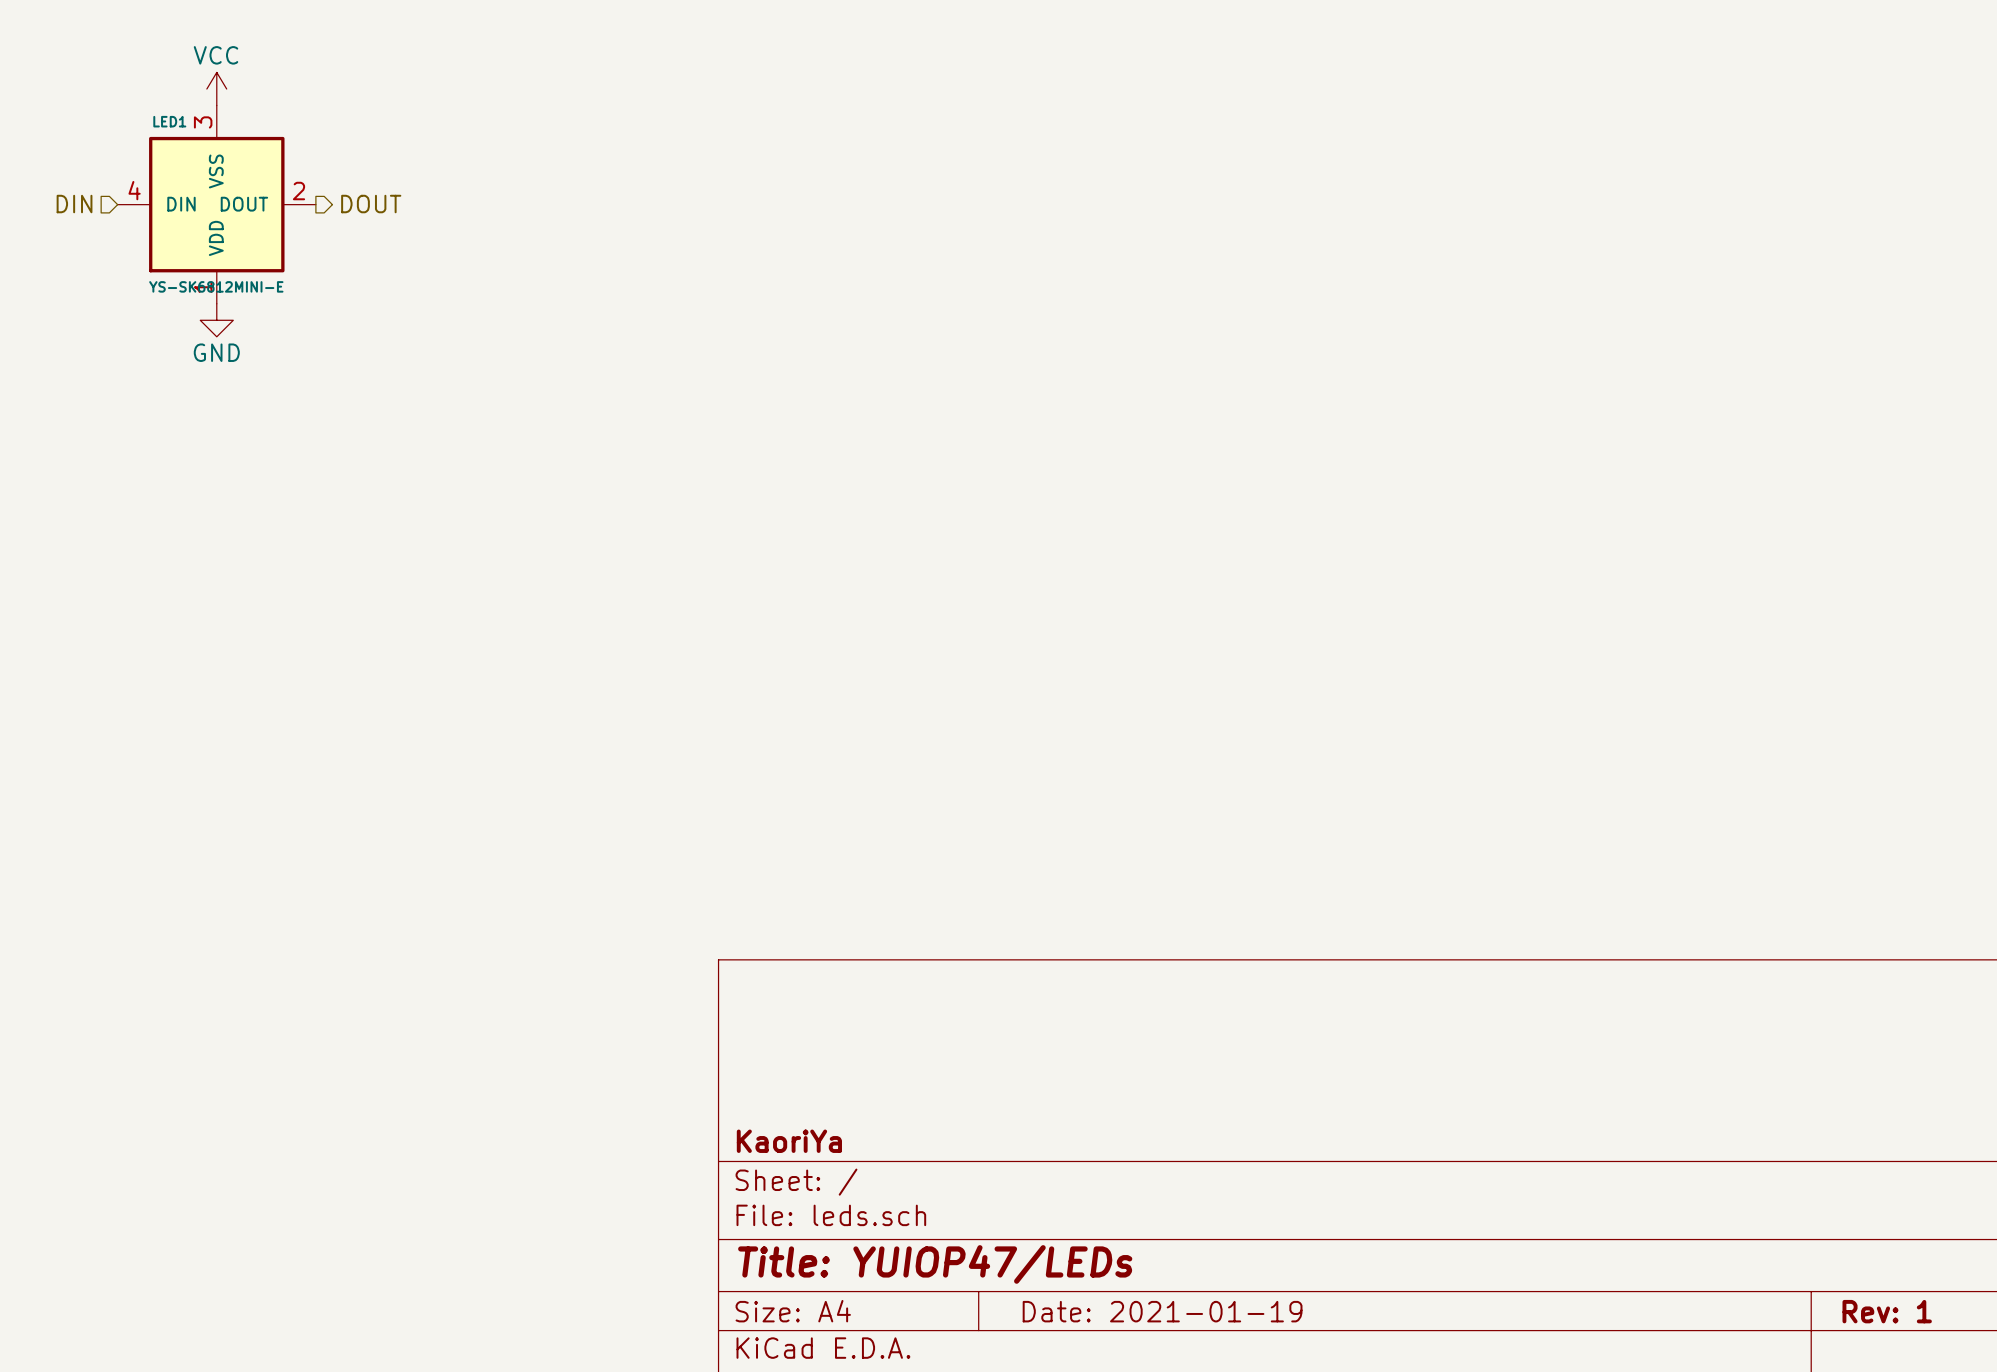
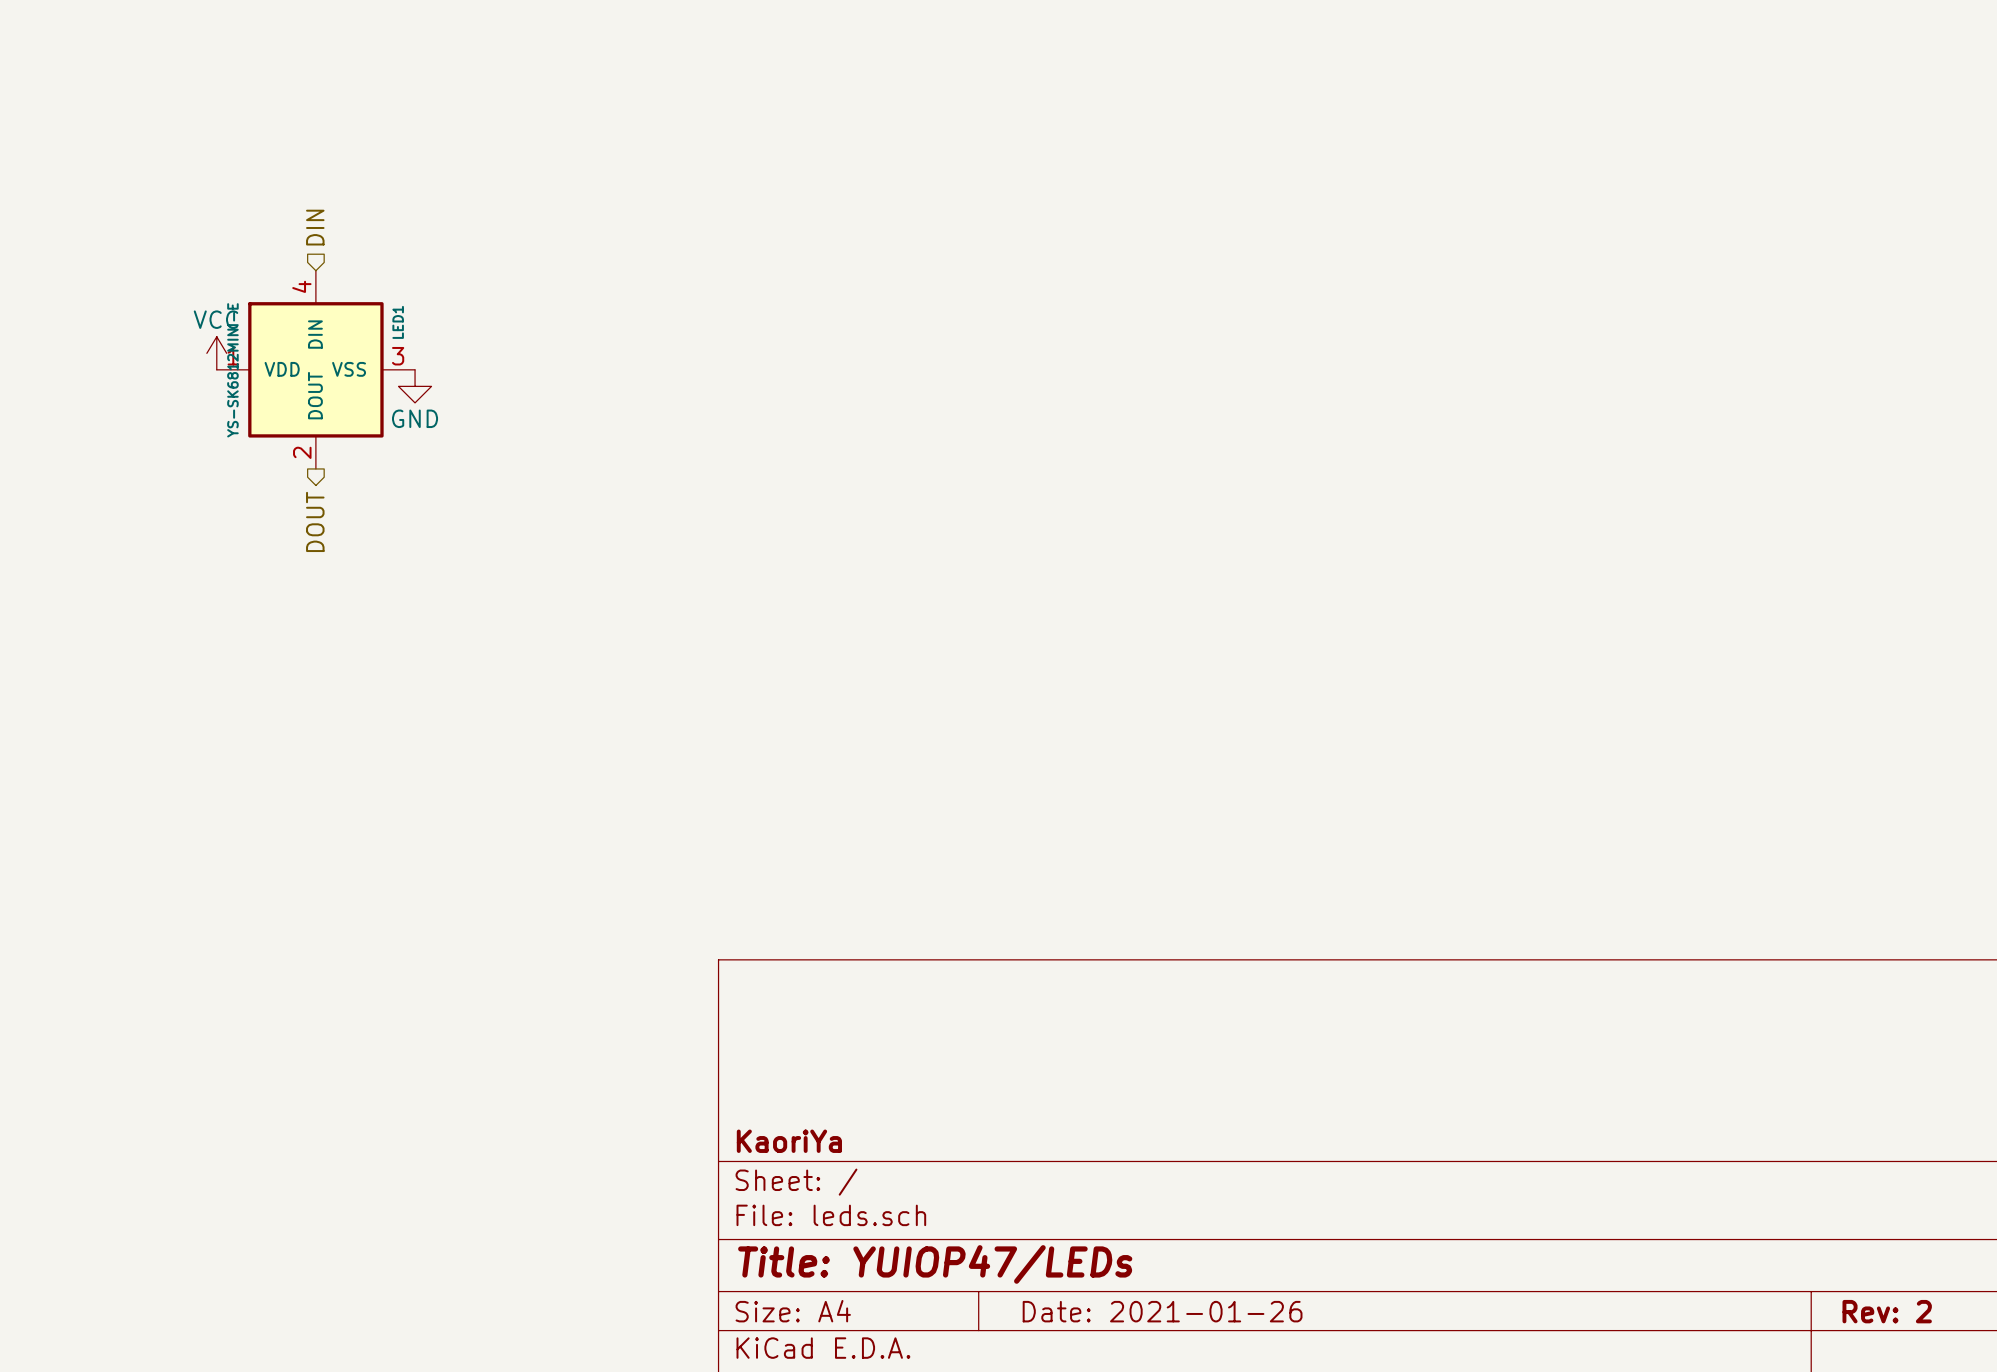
power symbol position: VCC (216, 89) -> VCC (216, 353)
hierarchical label rotation: 0° (74, 204) -> 90° clockwise (315, 227)
hierarchical label position: DIN (74, 204) -> DIN (315, 227)
LED1 rotation: 0° (216, 204) -> 90° clockwise (315, 369)
LED1 position: (216, 204) -> (315, 369)
hierarchical label rotation: 0° (371, 204) -> 90° clockwise (315, 521)
hierarchical label position: DOUT (371, 204) -> DOUT (315, 521)
power symbol position: GND (216, 320) -> GND (415, 386)
title block: Date: 2021-01-19 (1162, 1311) -> Date: 2021-01-26 (1162, 1311)
title block: Rev: 1 (1887, 1311) -> Rev: 2 (1887, 1311)

